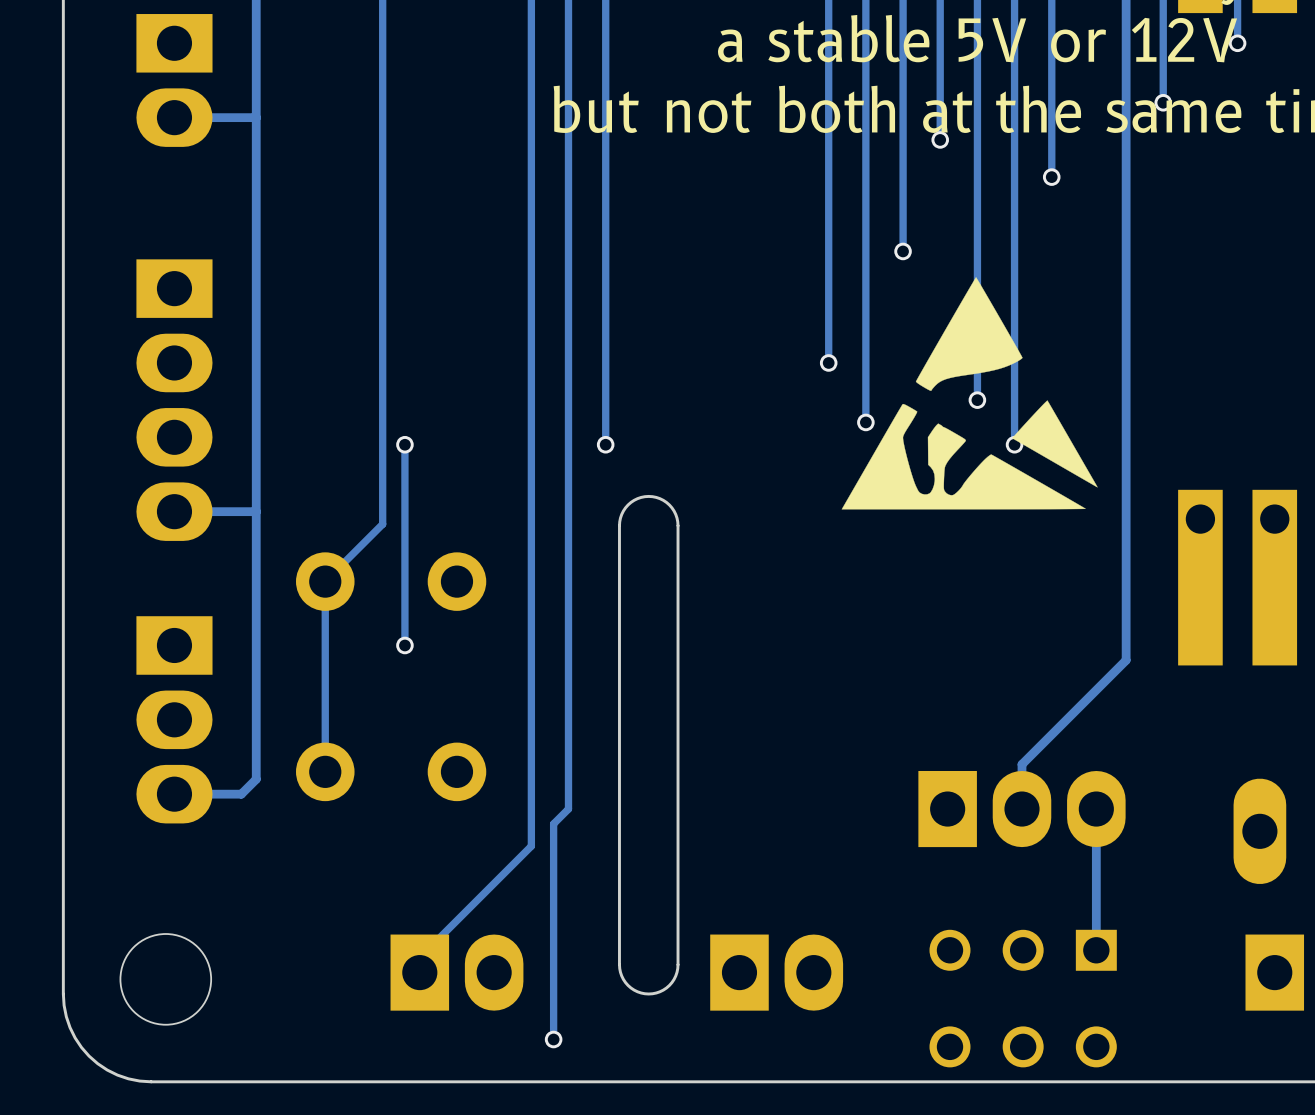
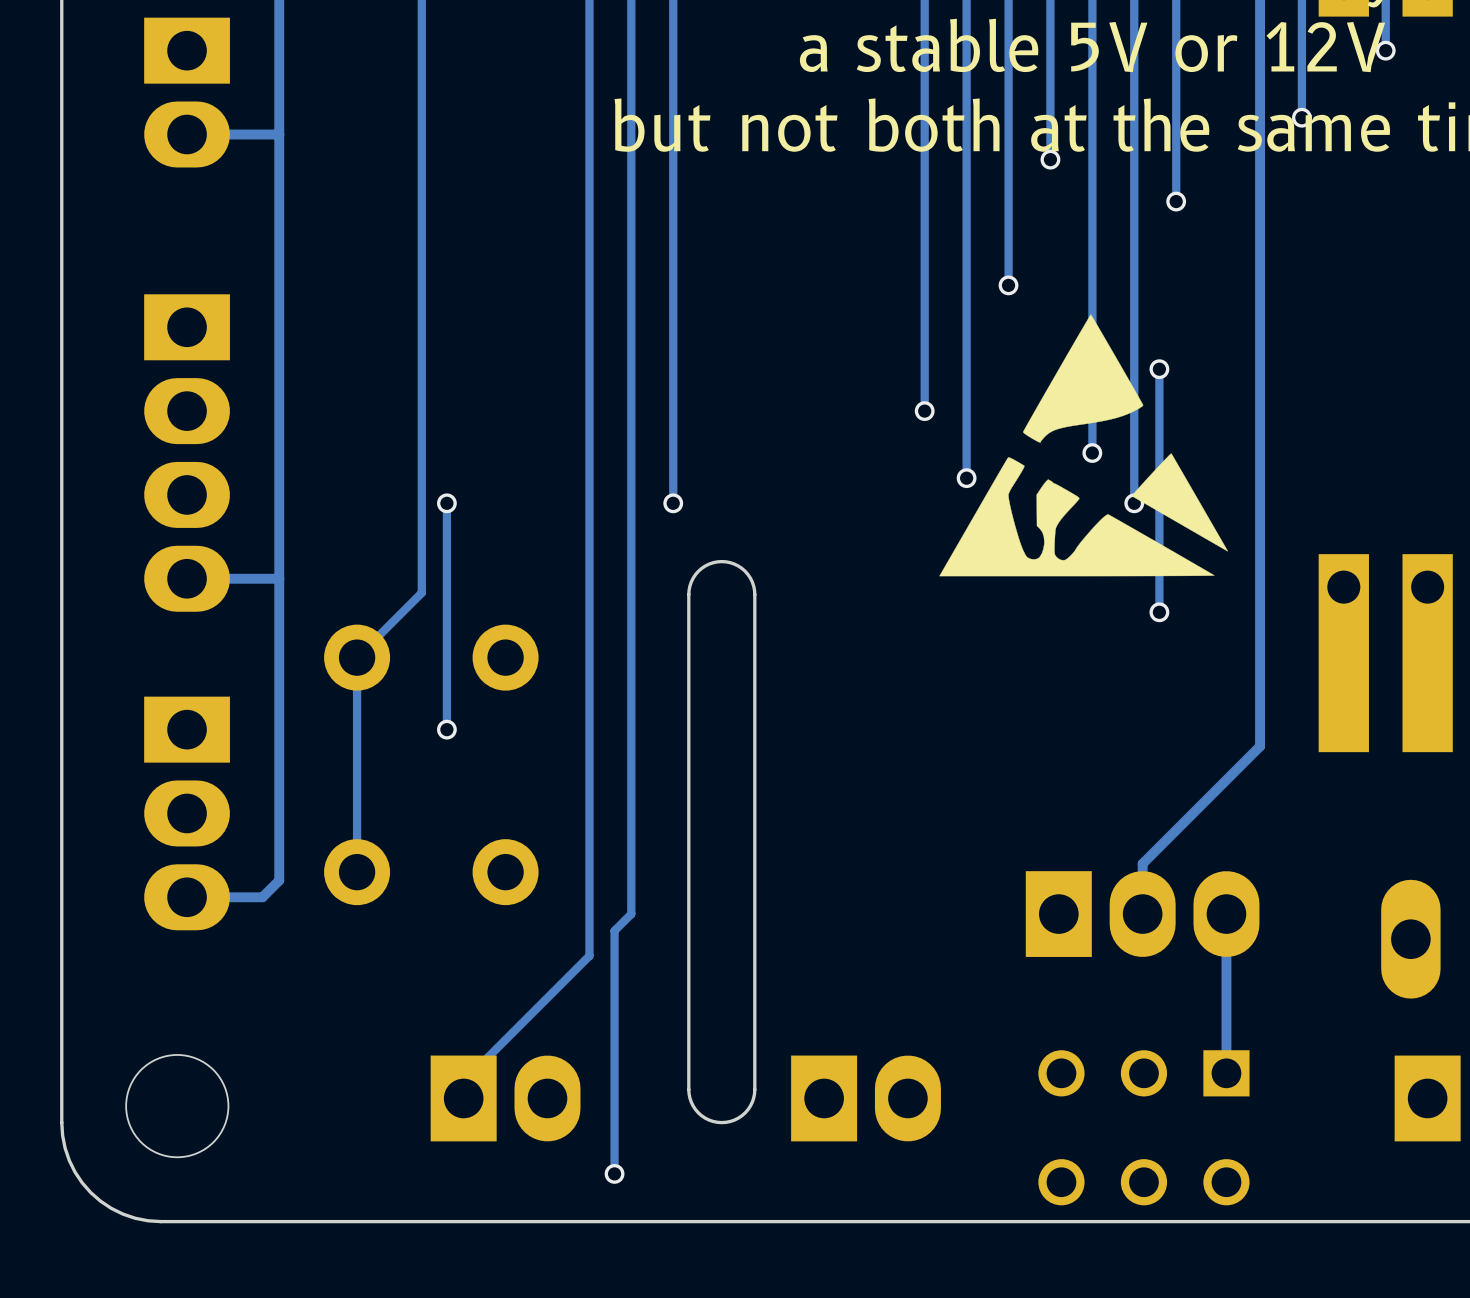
track: none -> (1159, 369) (1159, 612)
via: none -> (1159, 369)
via: none -> (1159, 612)

